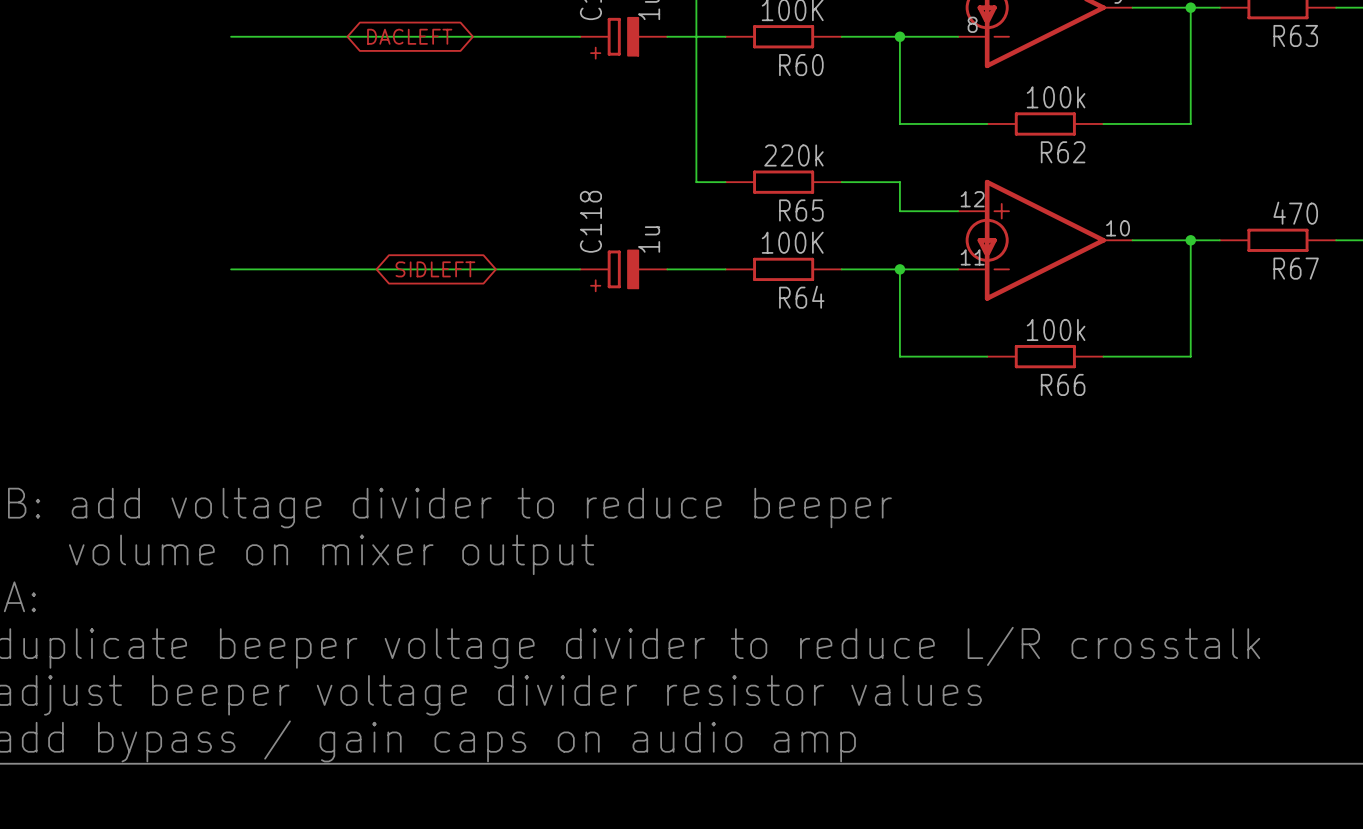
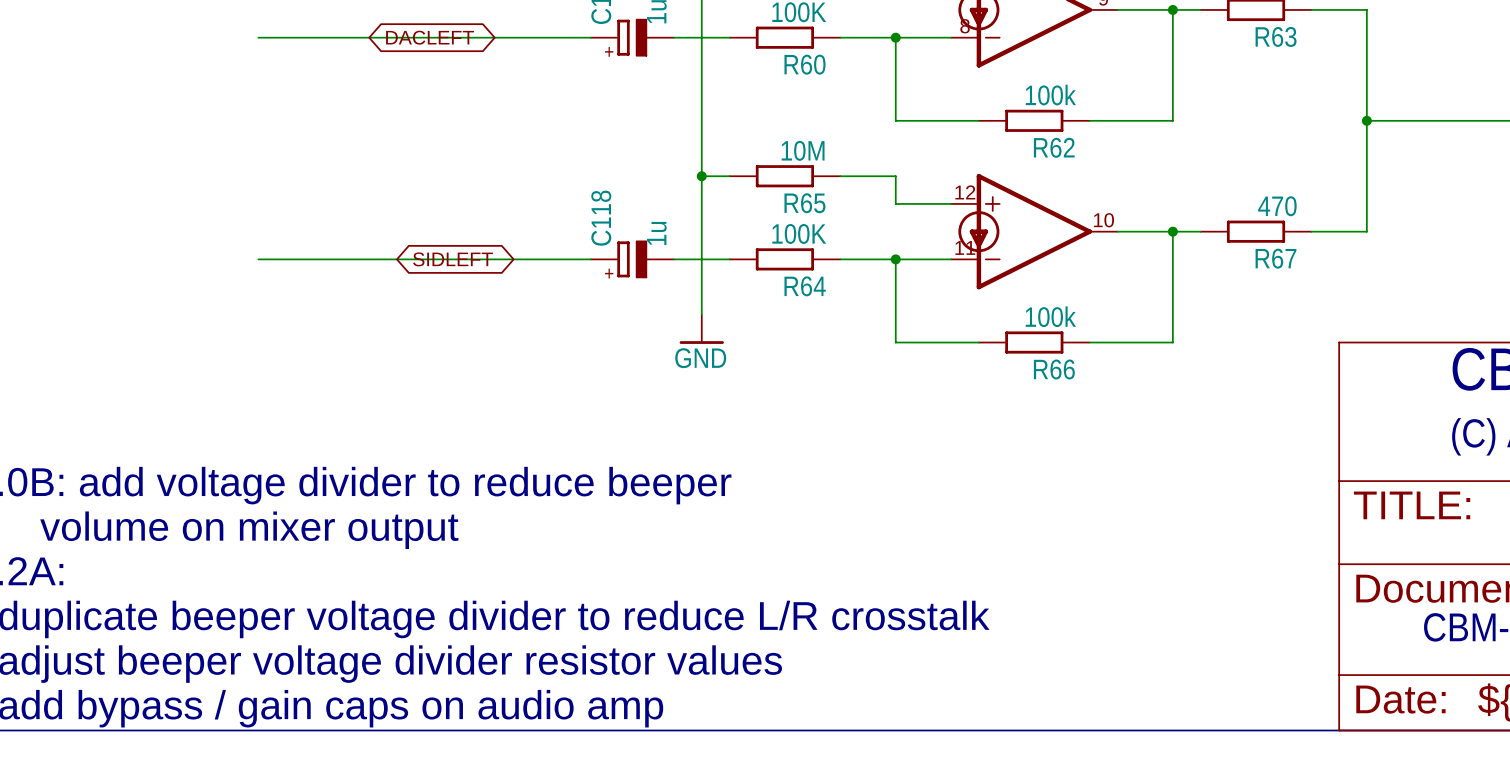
R65 value: 220k (793, 155) -> 10M (803, 150)
wire: none -> (701, 176) (701, 314)
junction: none -> (701, 176)
power symbol: none -> GND (701, 329)

